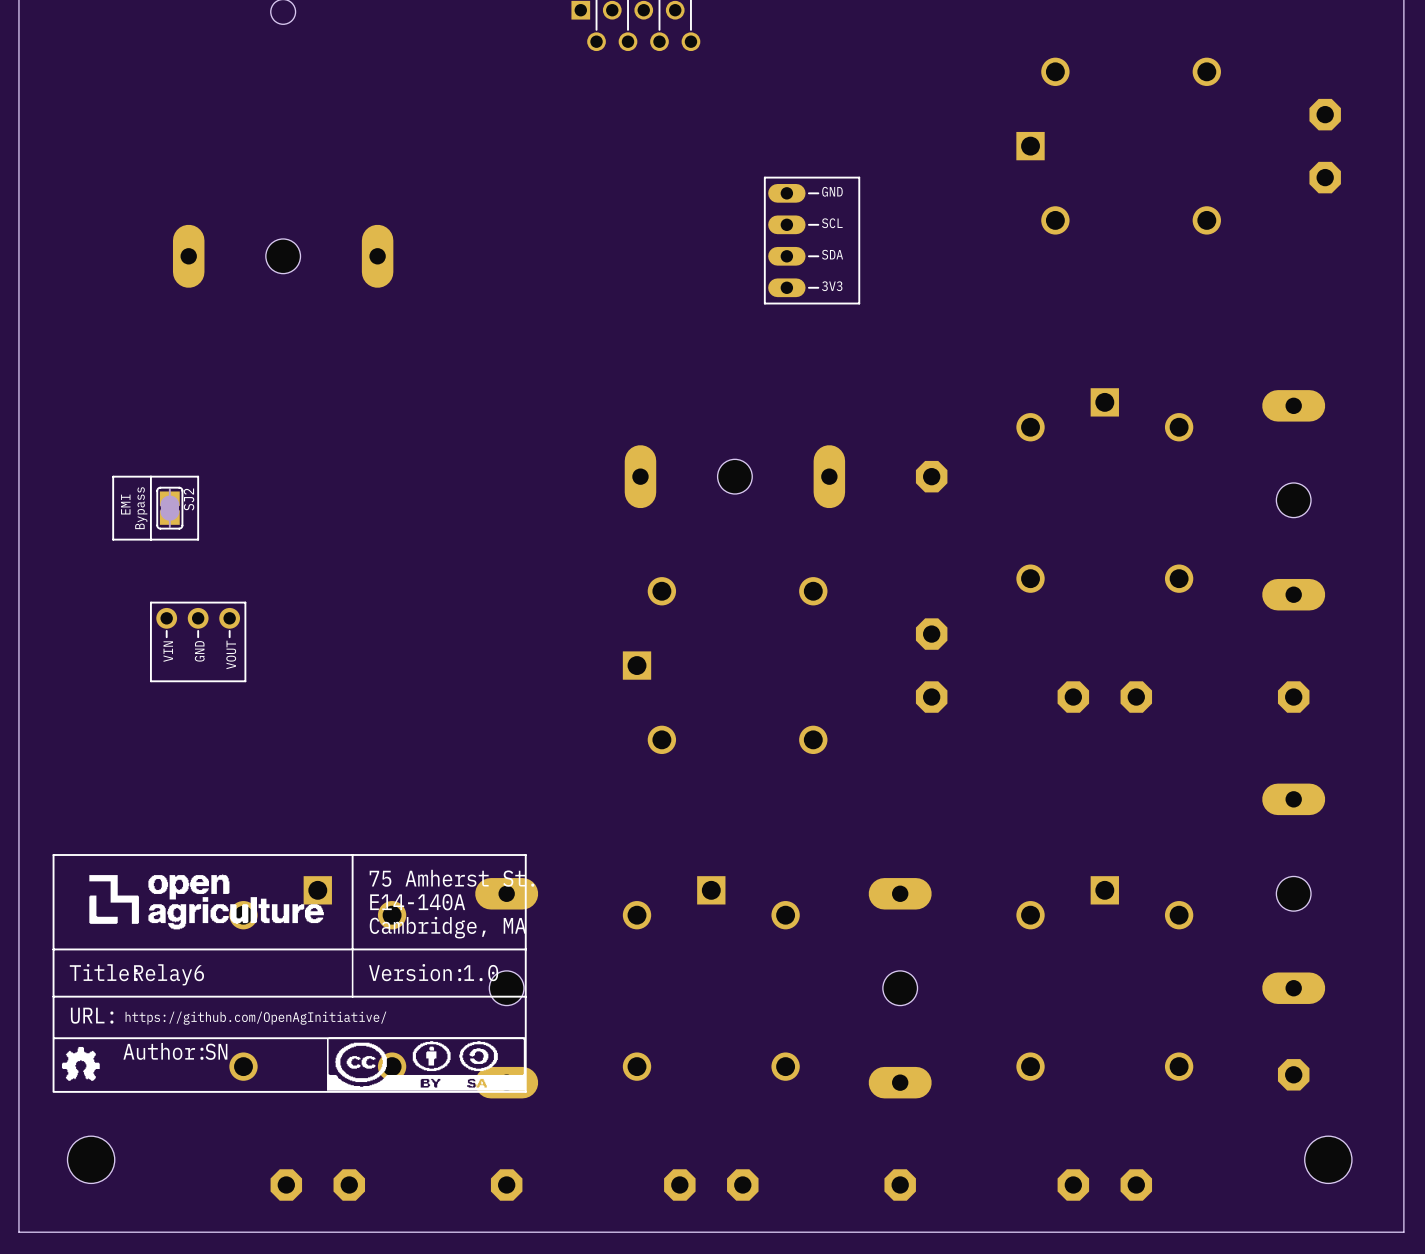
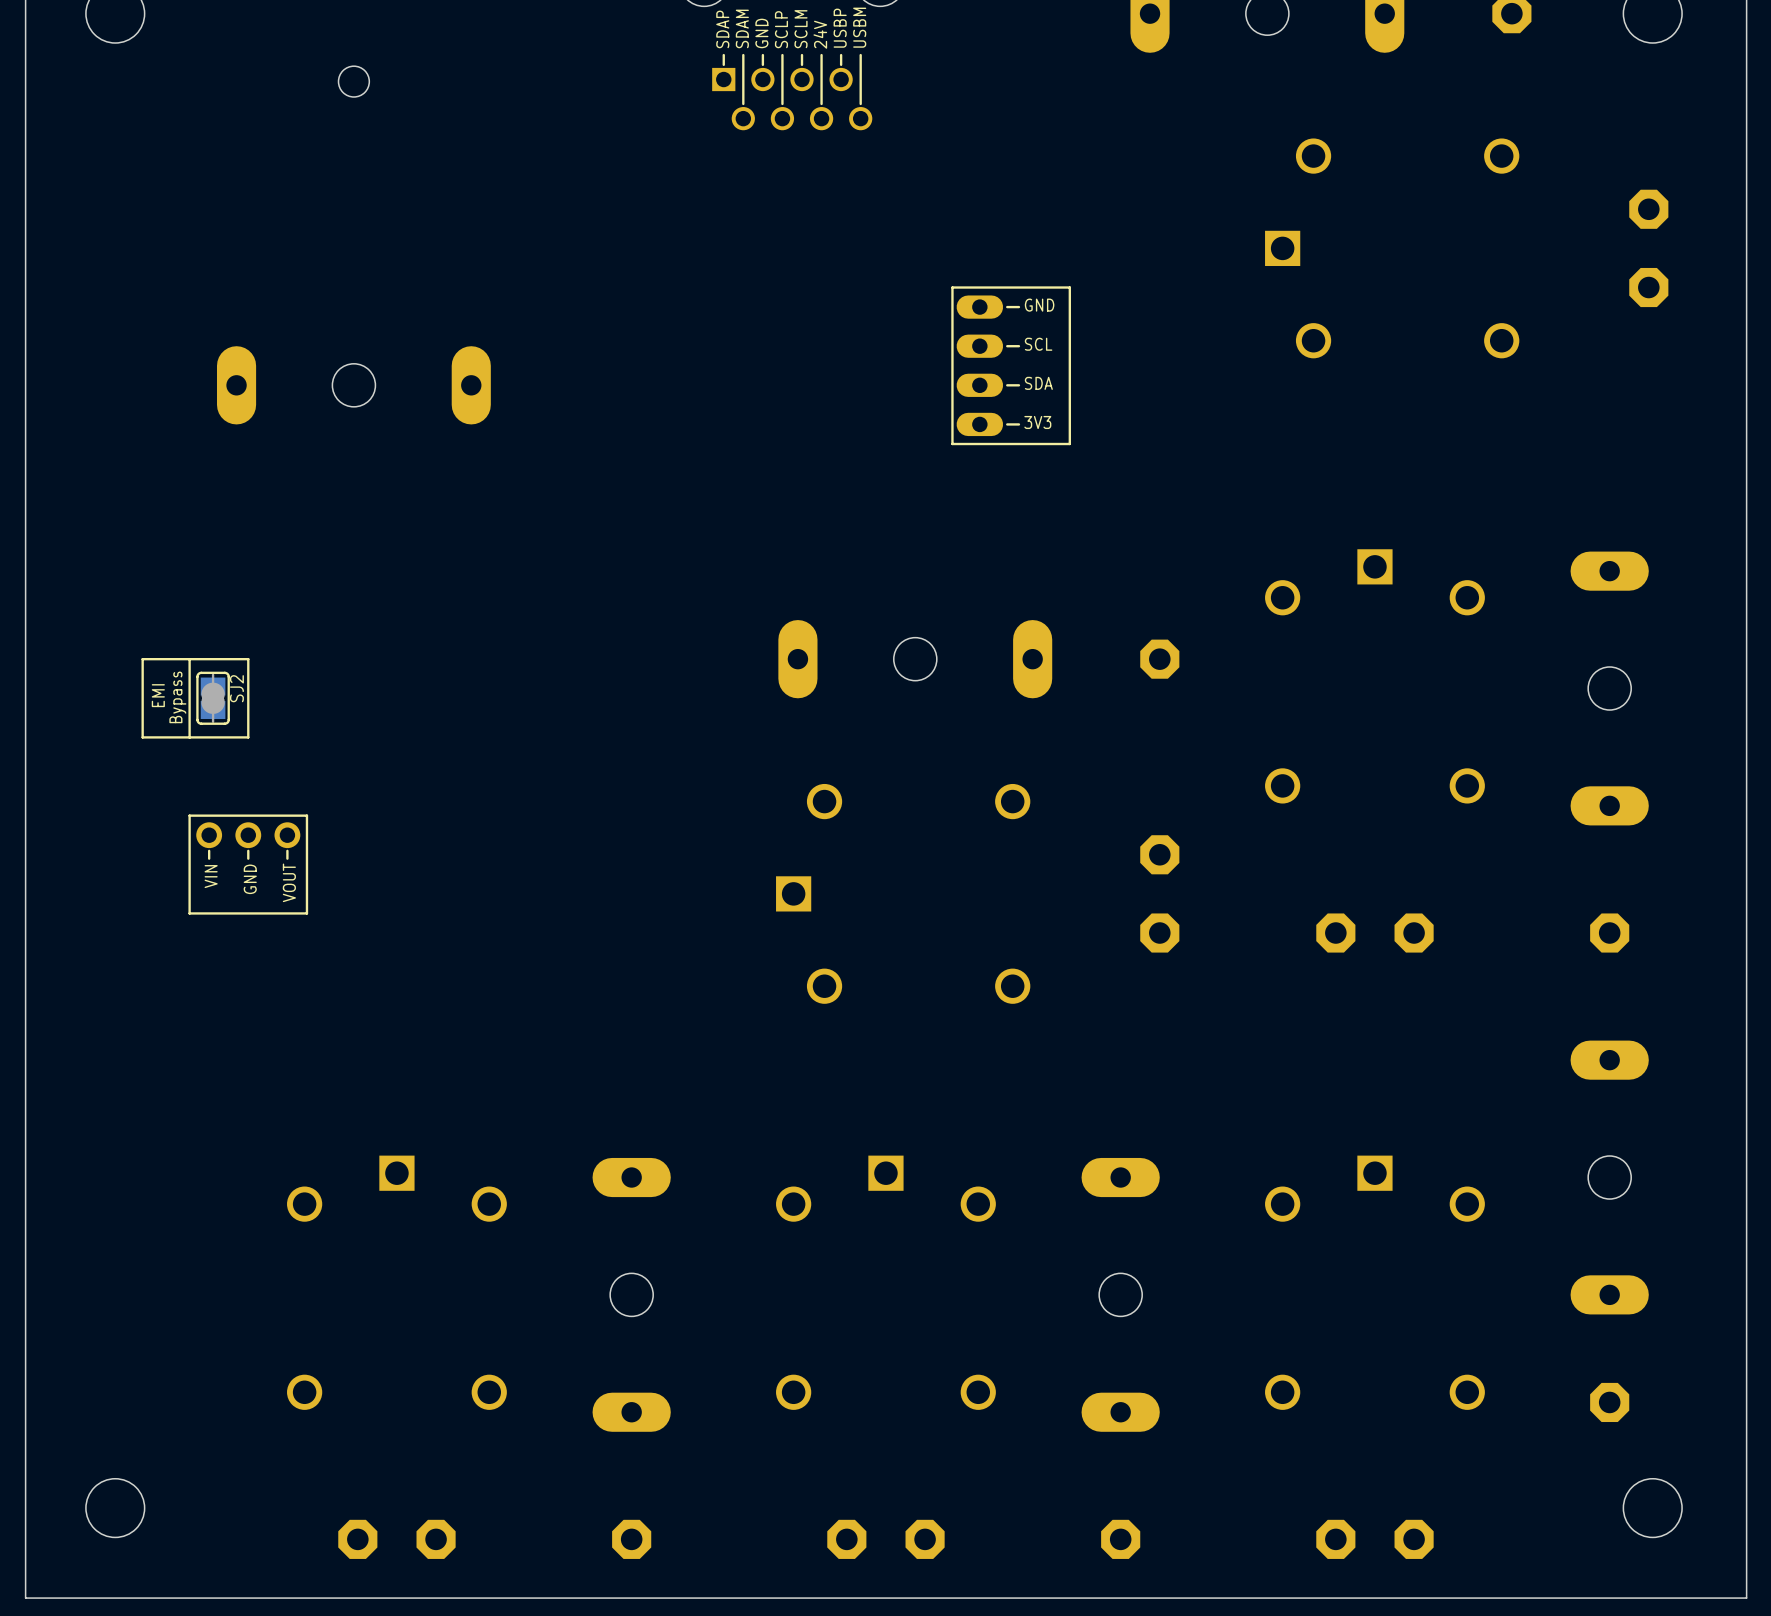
drawing: [52, 854, 527, 1093] -> none

